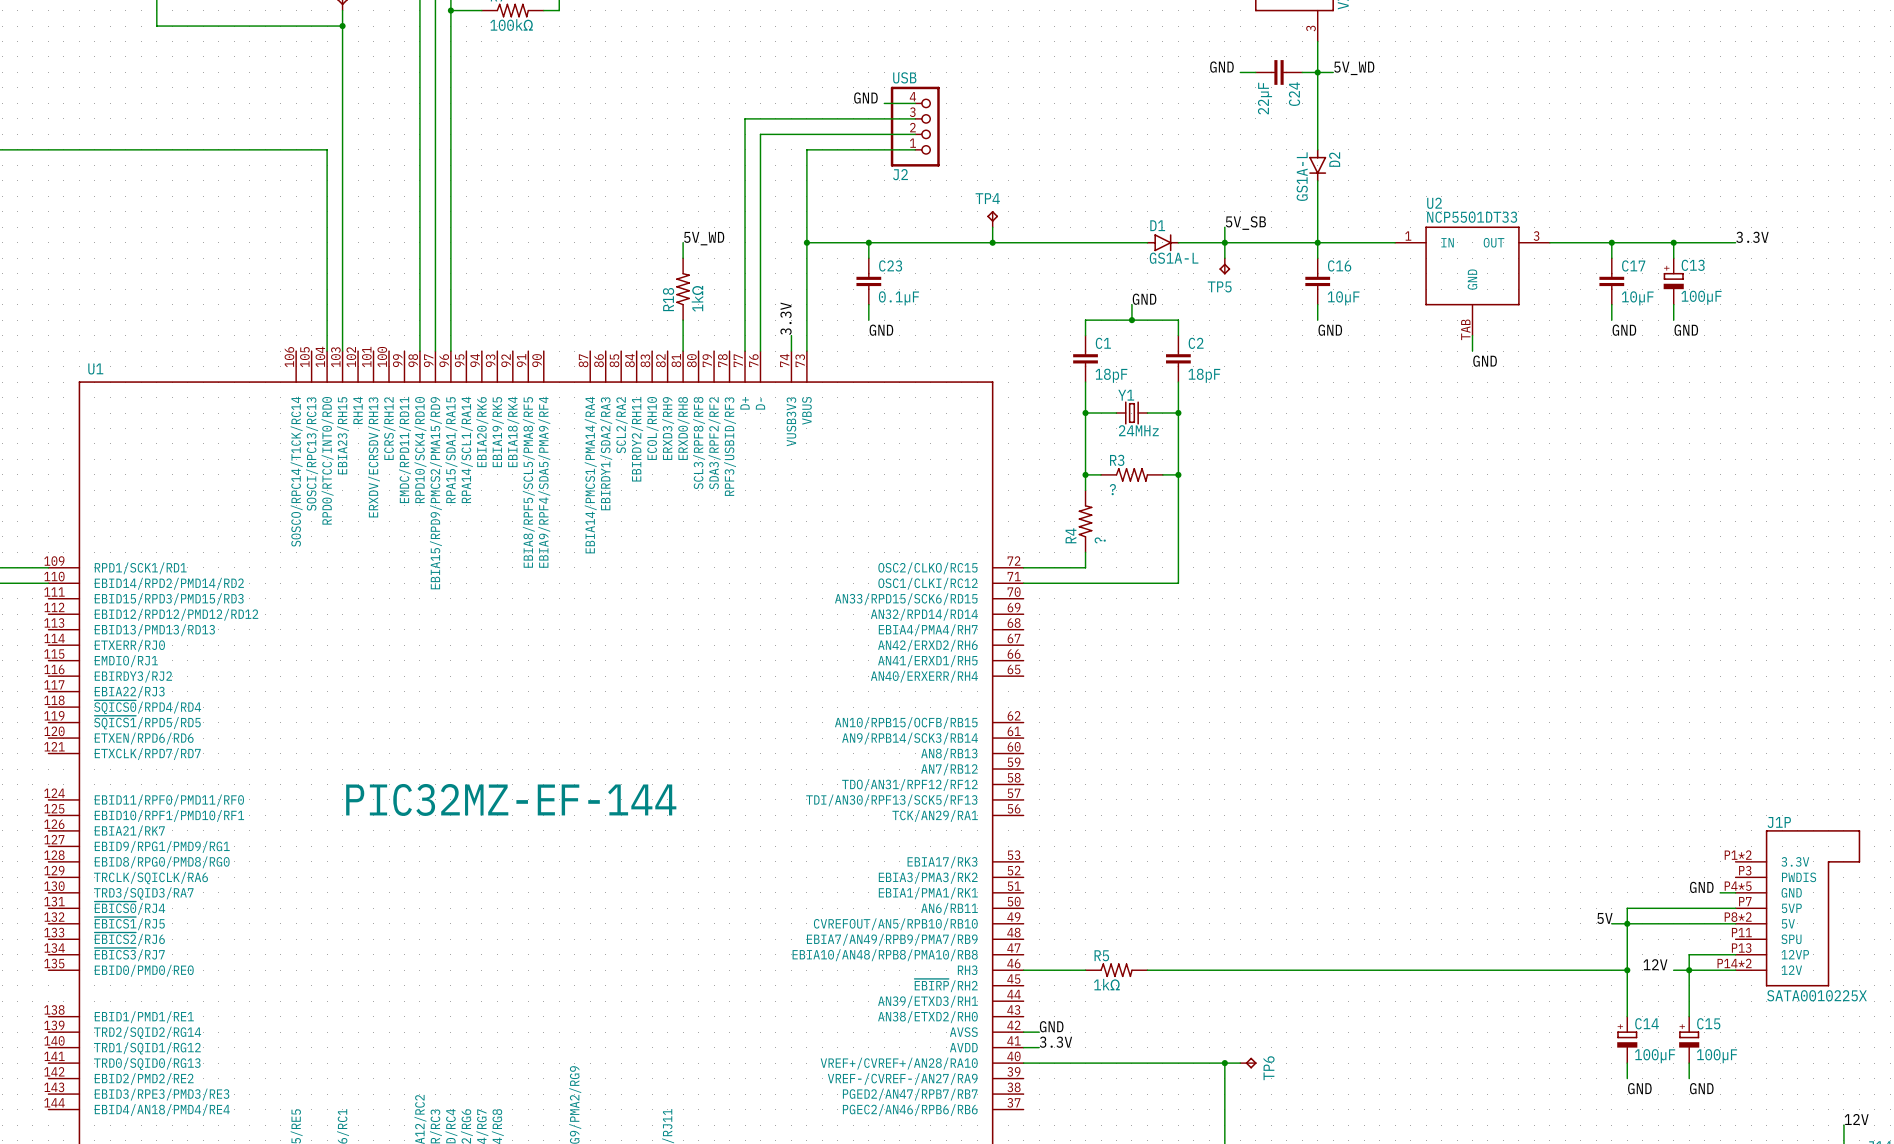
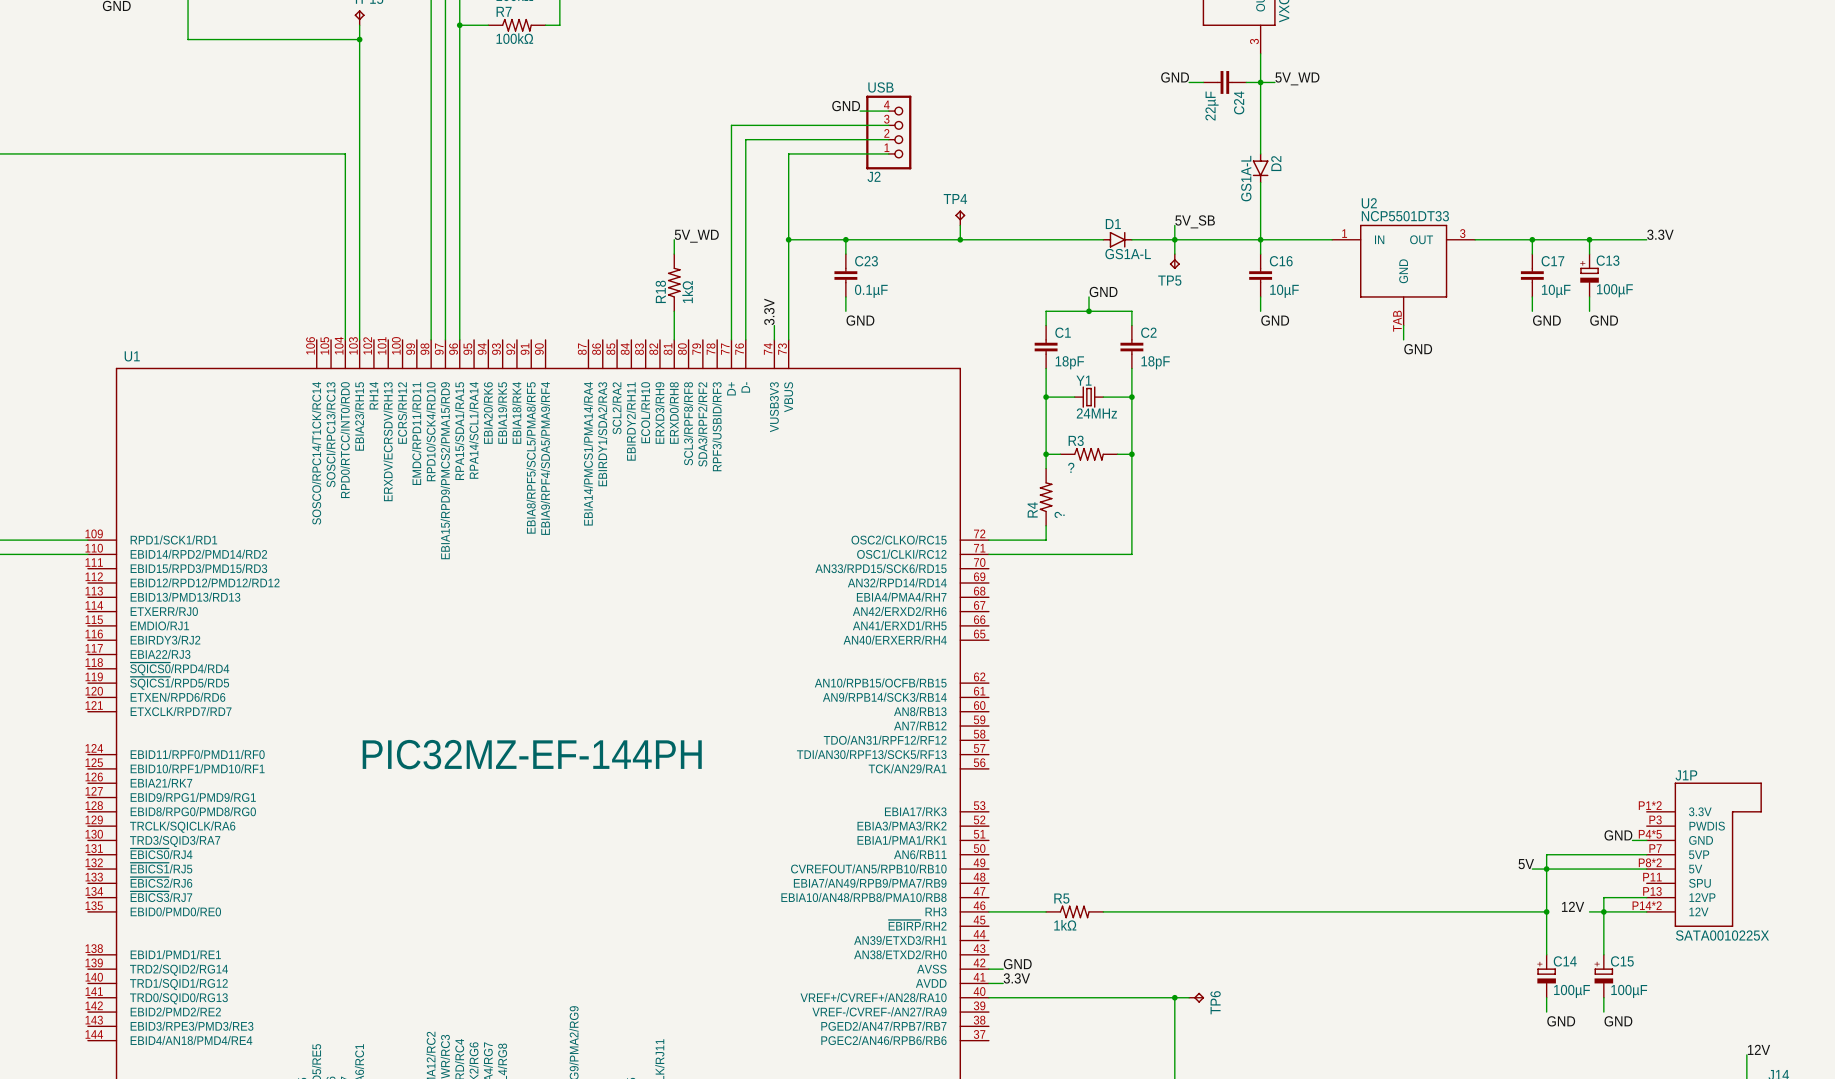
U1 value: PIC32MZ-EF-144 (511, 799) -> PIC32MZ-EF-144PH (532, 754)

